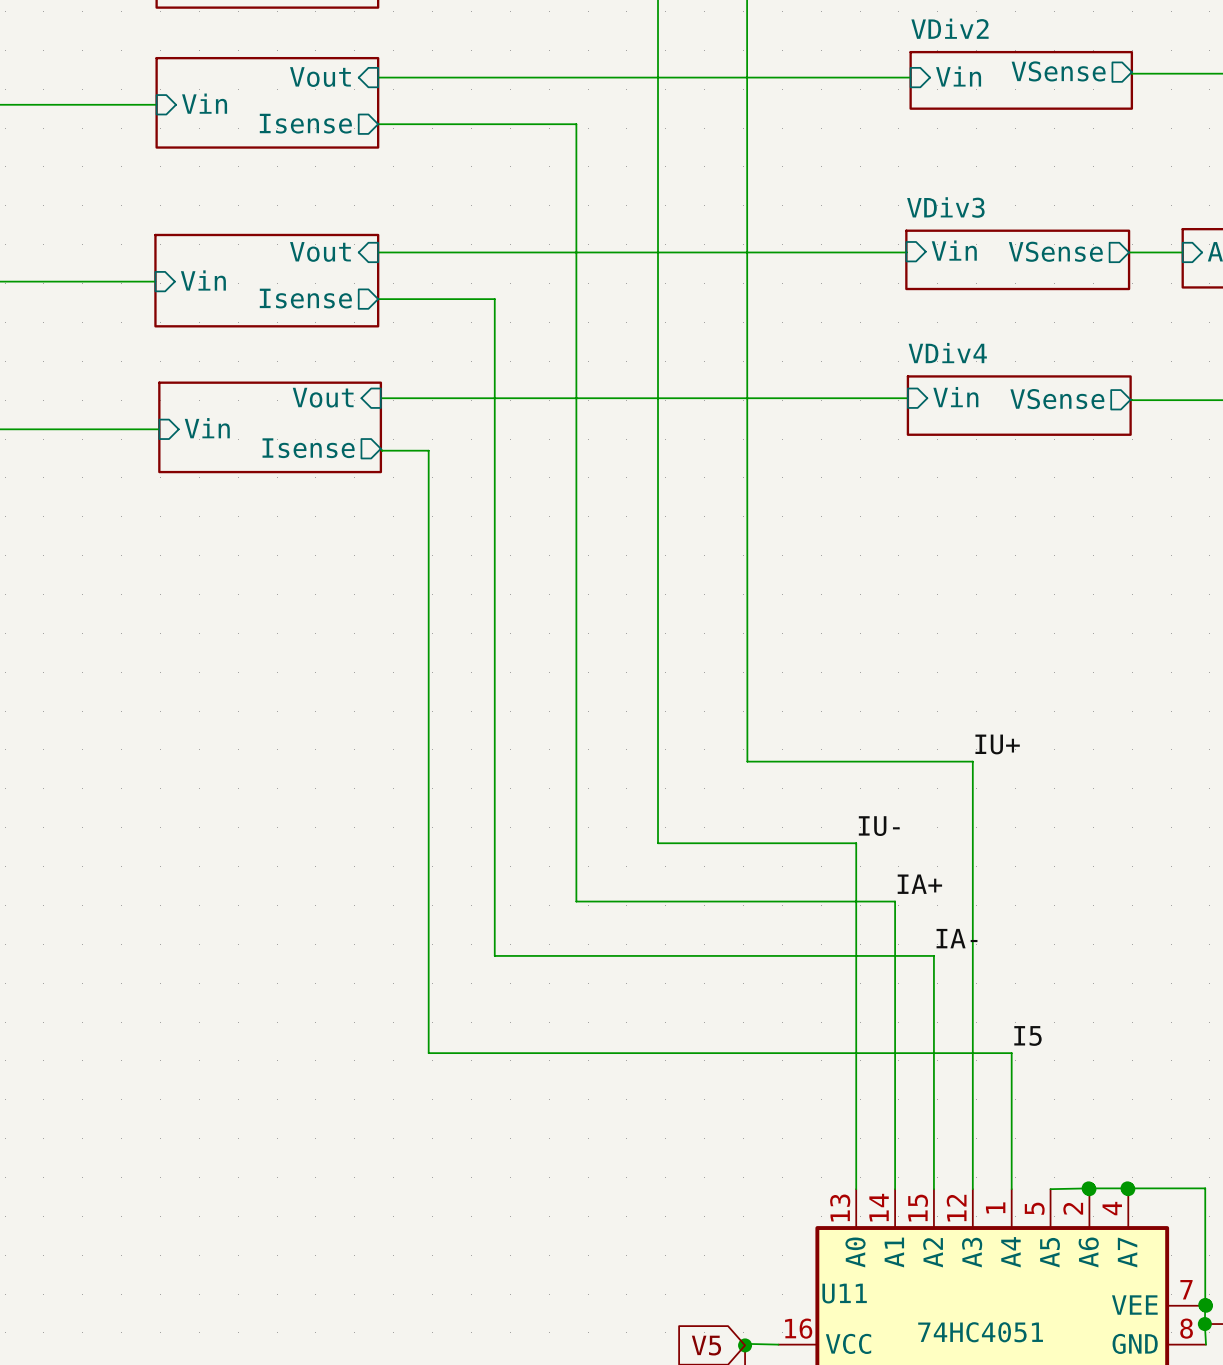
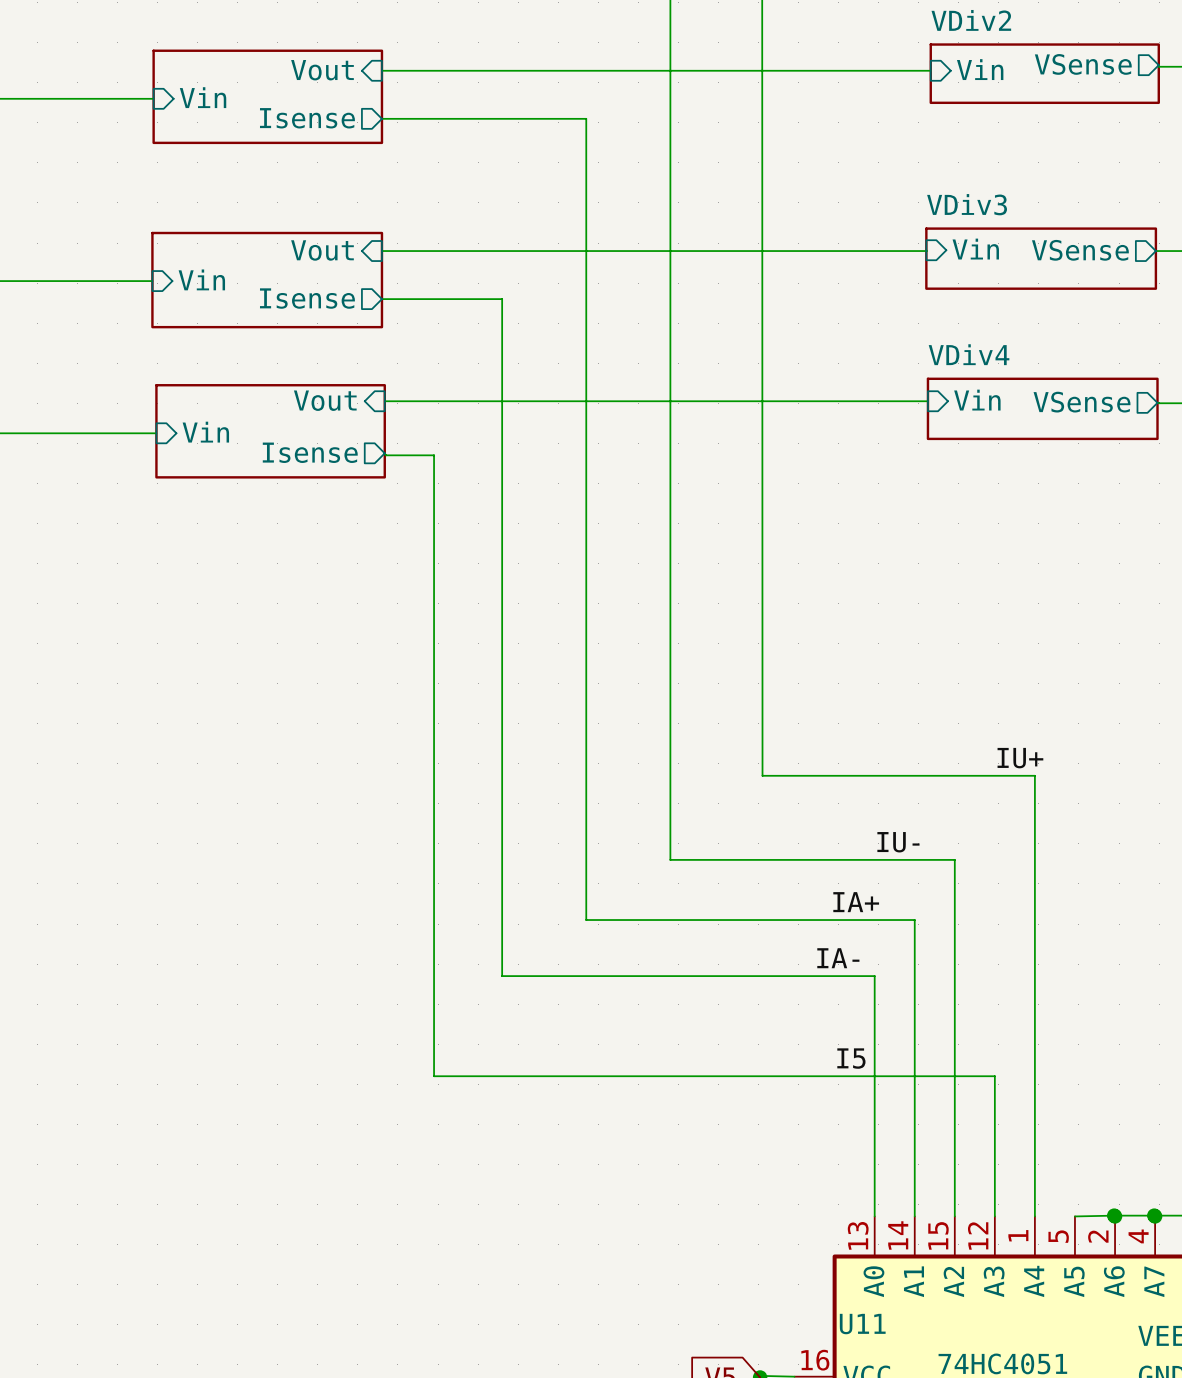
wire: (972, 761) (972, 1053) (1011, 1053) -> (994, 775) (1034, 775) (1034, 1076)
wire: (856, 843) (856, 955) (933, 955) -> (874, 859) (954, 859) (954, 976)
label position: IA+ (919, 884) -> IA+ (856, 902)
label position: IA- (957, 938) -> IA- (838, 958)
label position: I5 (1027, 1035) -> I5 (851, 1058)

